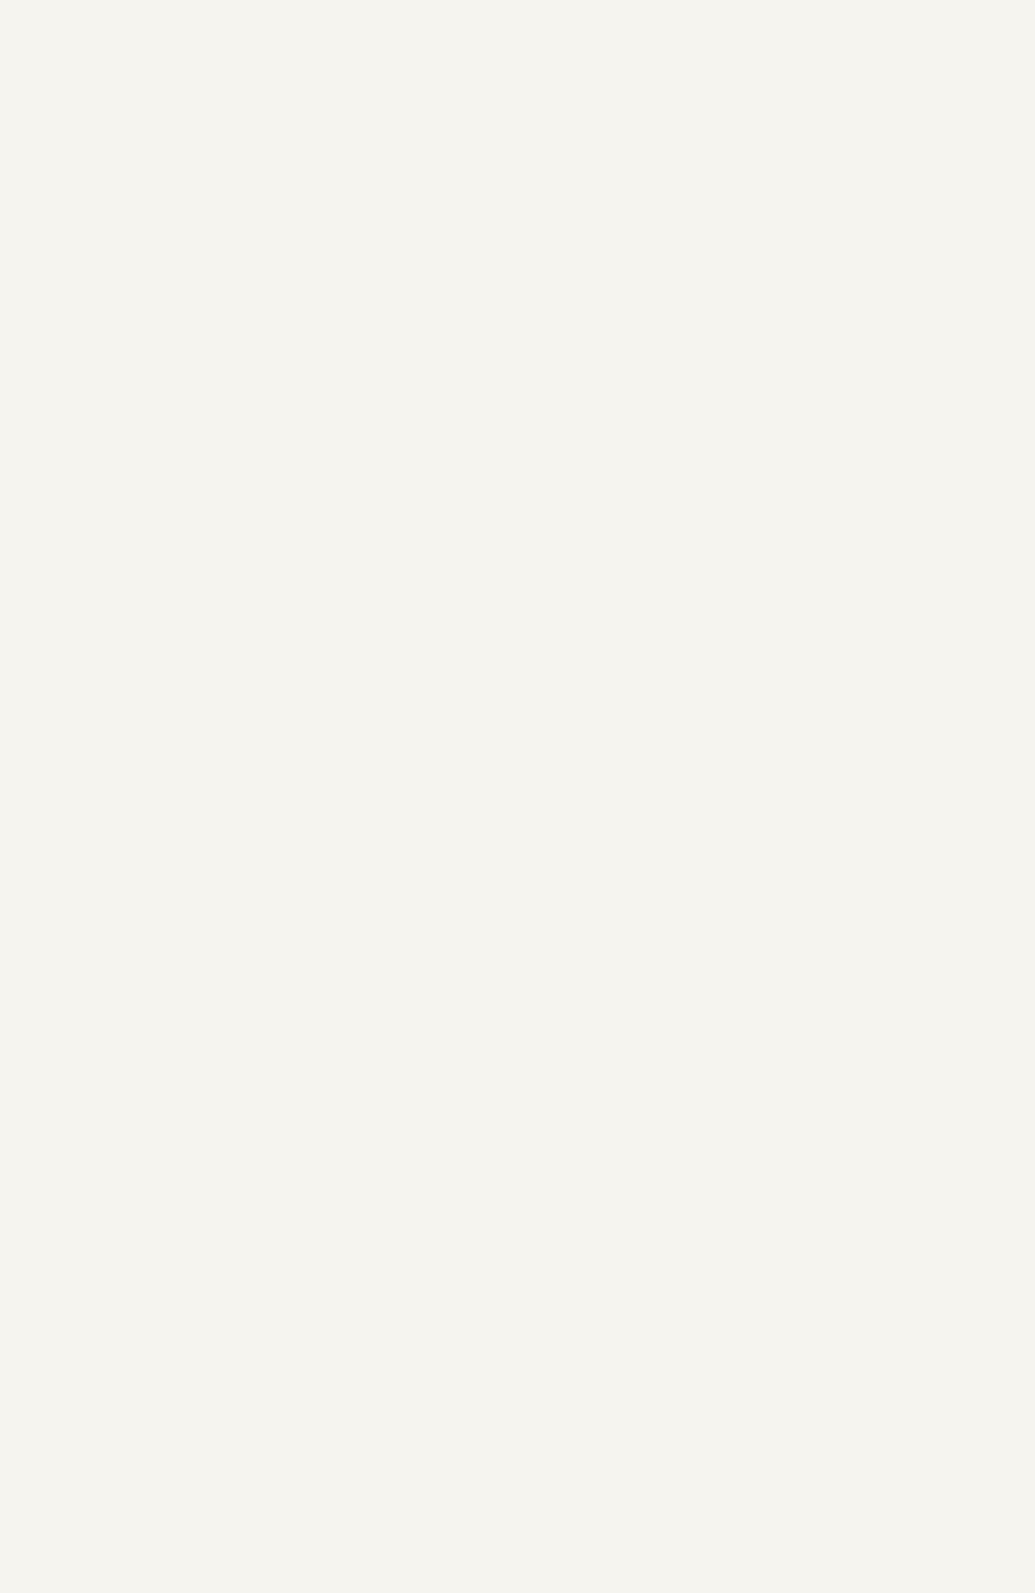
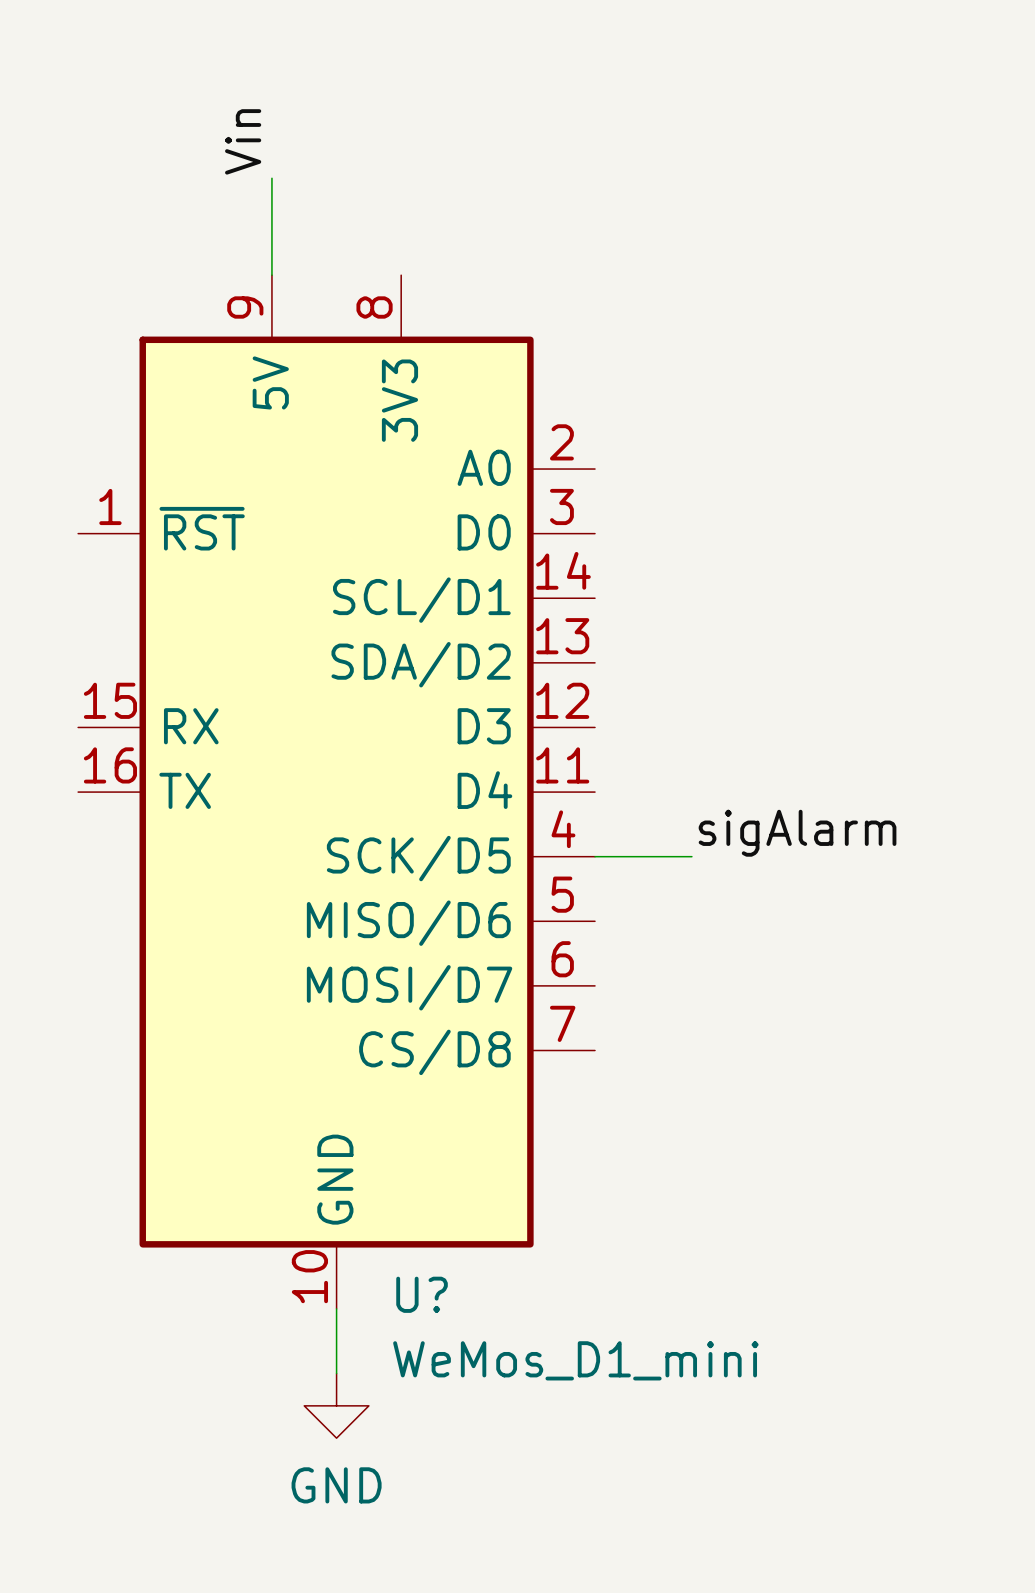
label: none -> Vin (243, 141)
wire: none -> (271, 178) (271, 275)
U?: none -> WeMos_D1_mini (336, 792)
label: none -> sigAlarm (797, 833)
wire: none -> (595, 856) (691, 856)
wire: none -> (336, 1308) (336, 1373)
power symbol: none -> GND (336, 1405)

